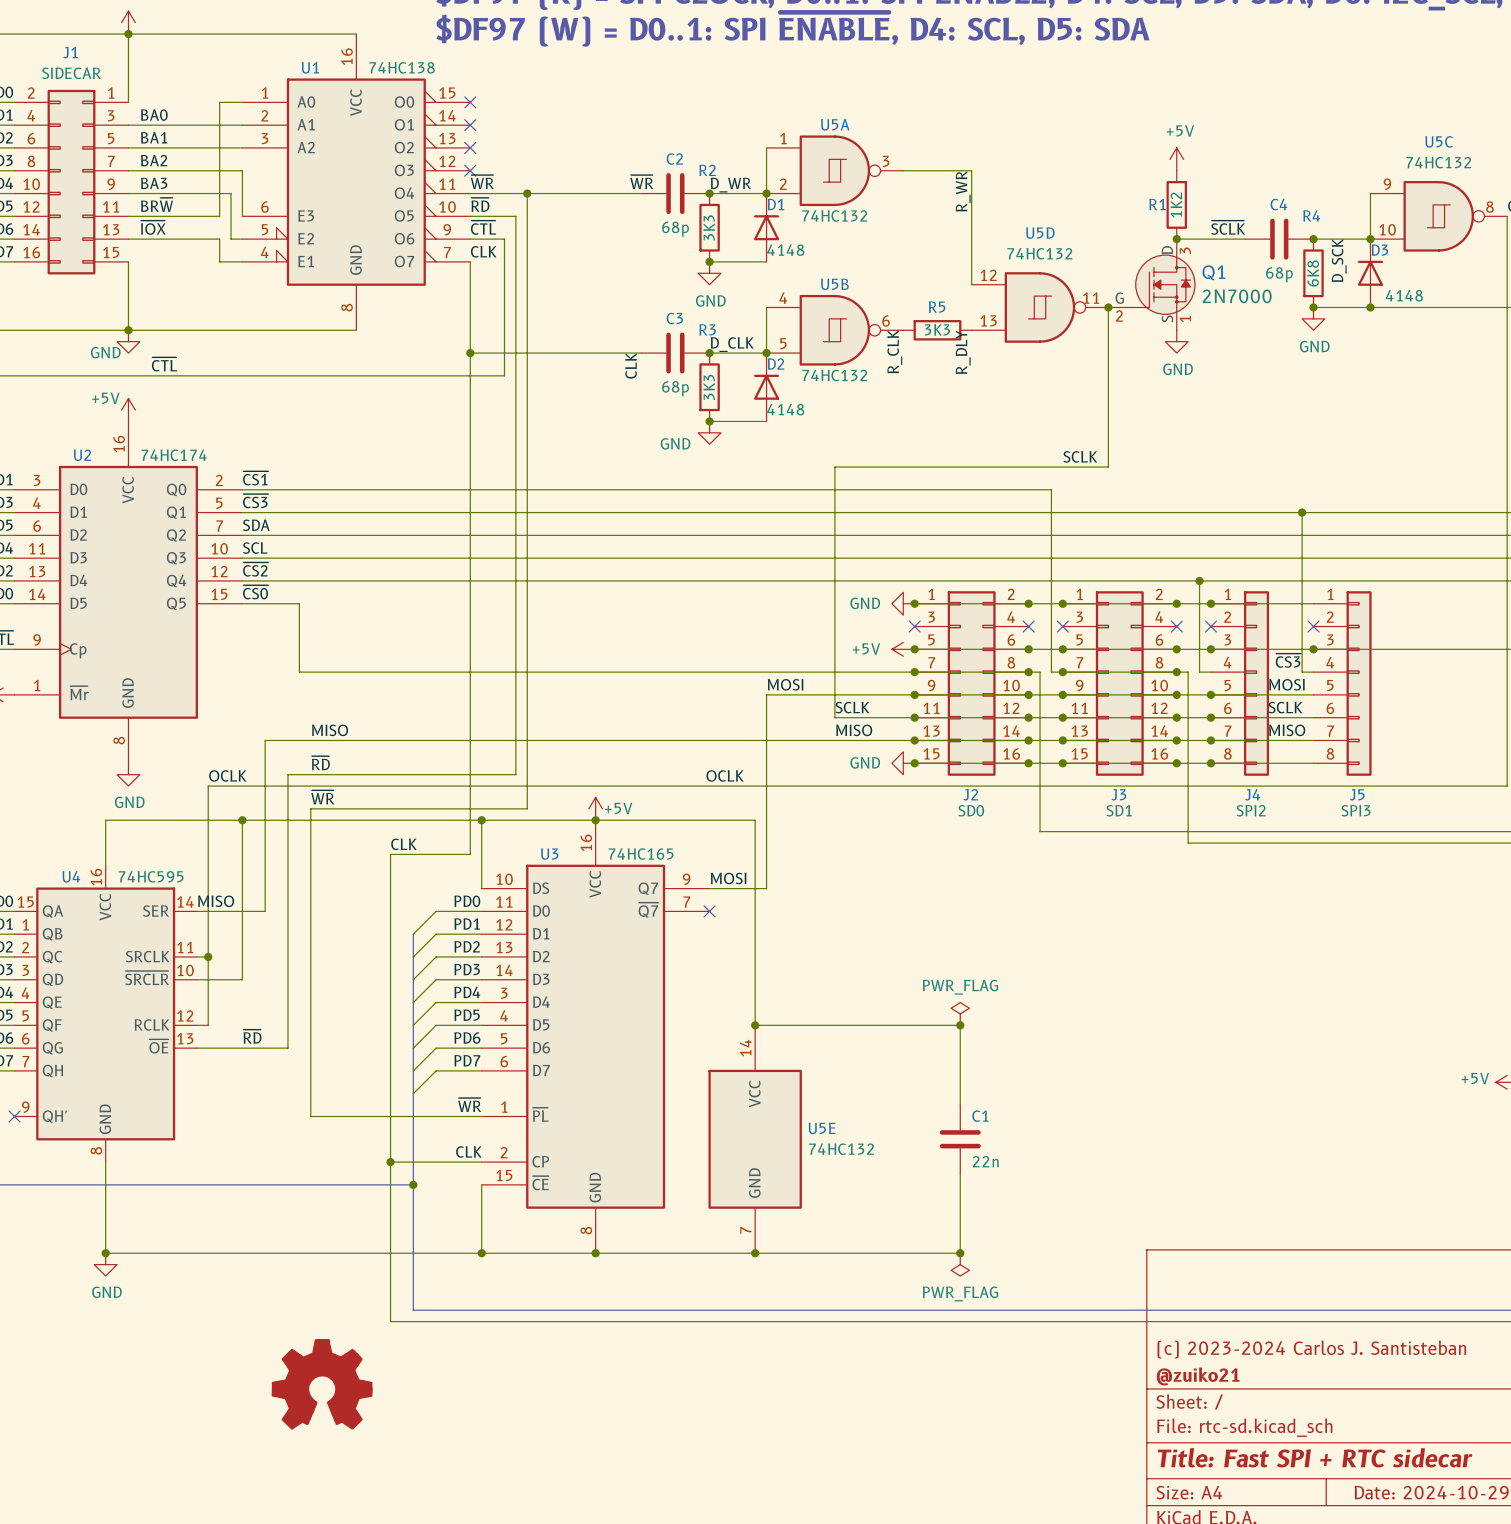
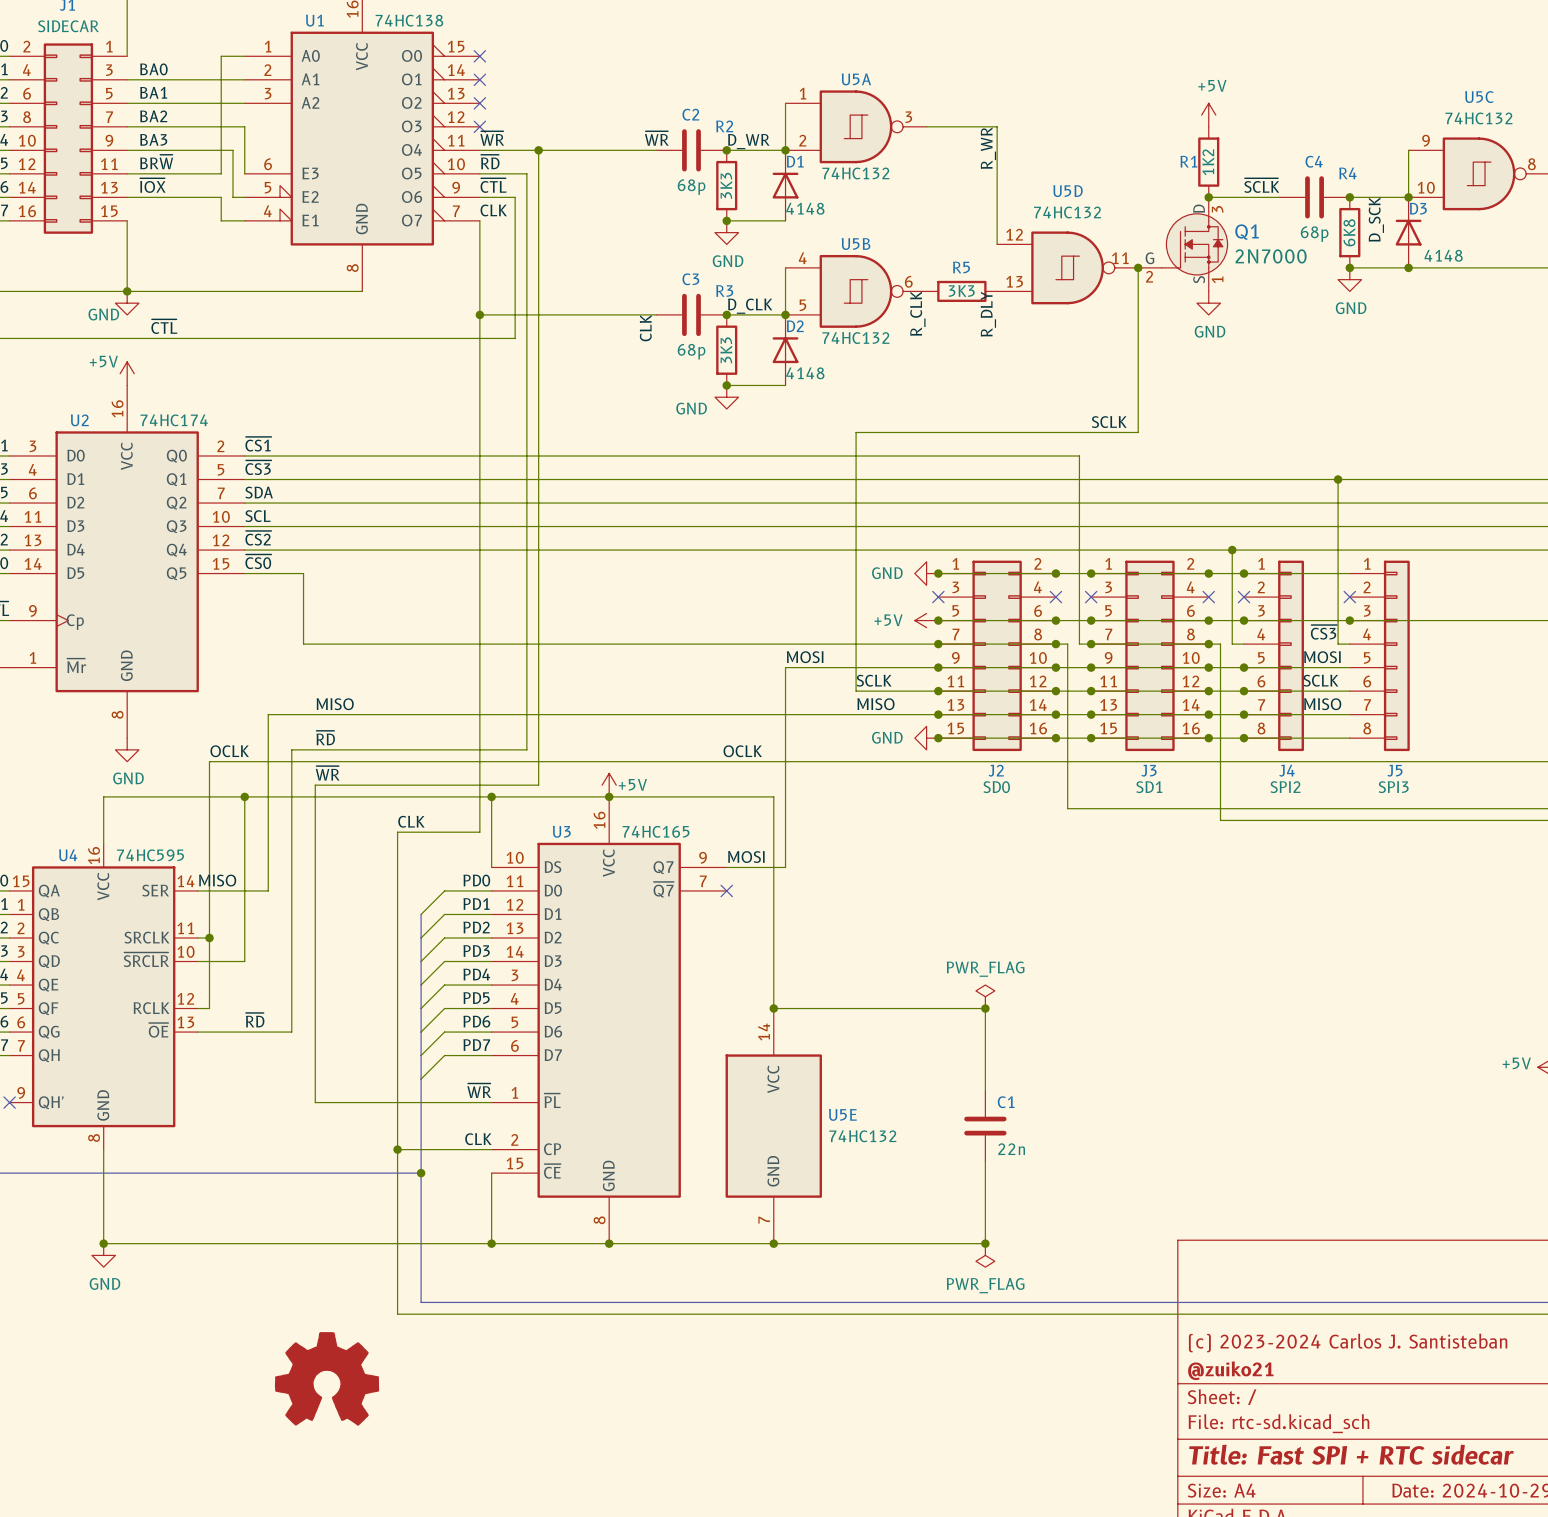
part flip: as is (322, 1384) -> left-right (327, 1378)

